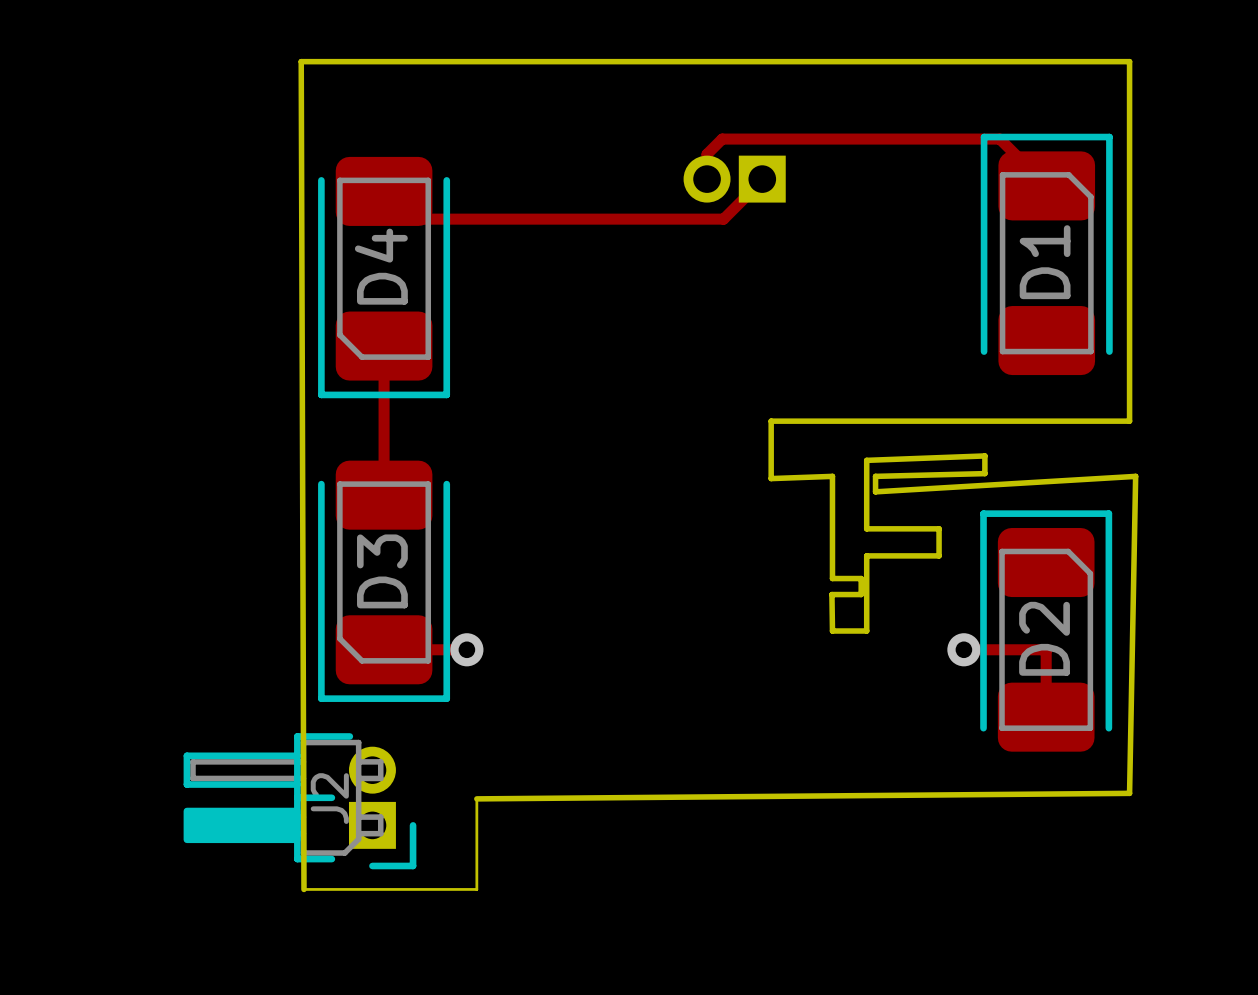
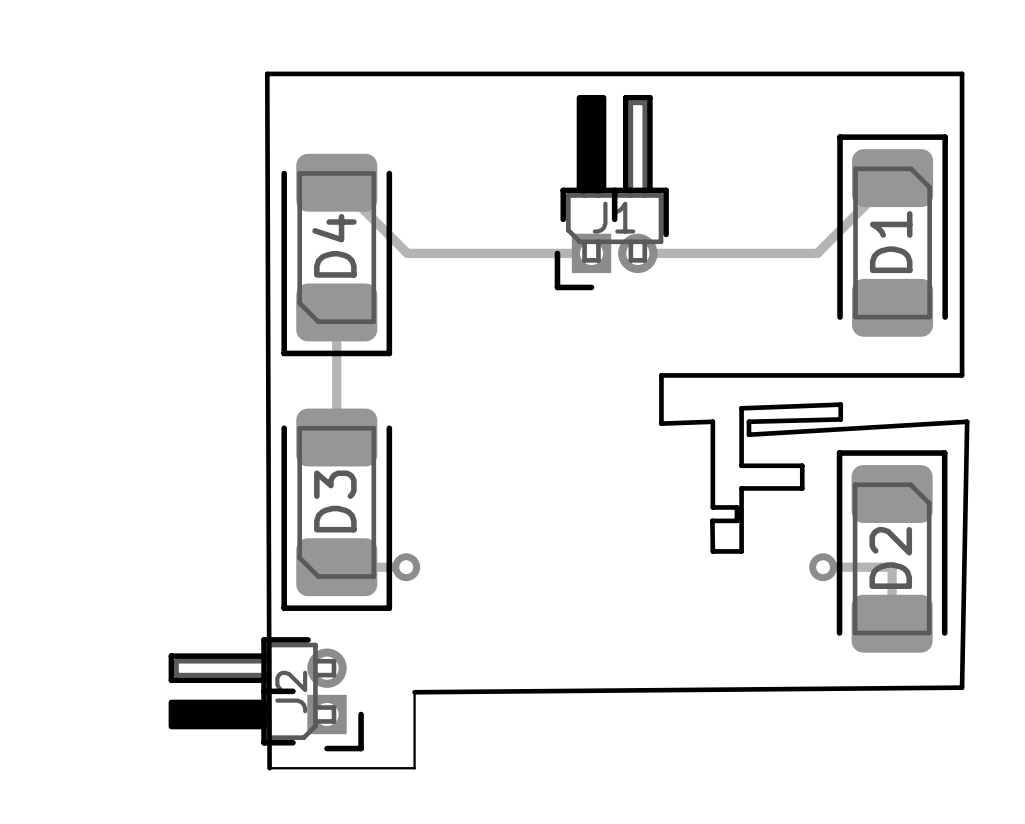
track: (707, 179) (707, 154) (722, 139) (999, 139) (1046, 185) -> (637, 253) (817, 253) (892, 178)
J1 side: bottom (734, 179) -> top (611, 192)
track: (762, 179) (723, 219) (411, 219) -> (591, 253) (407, 253) (360, 206)

